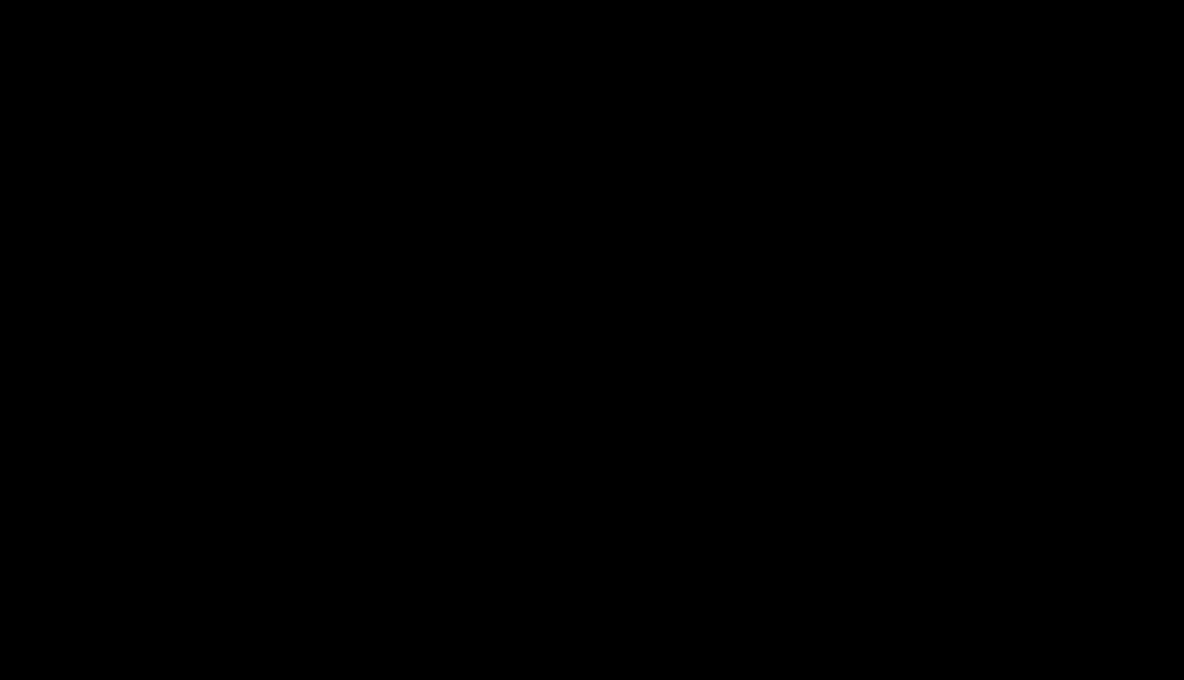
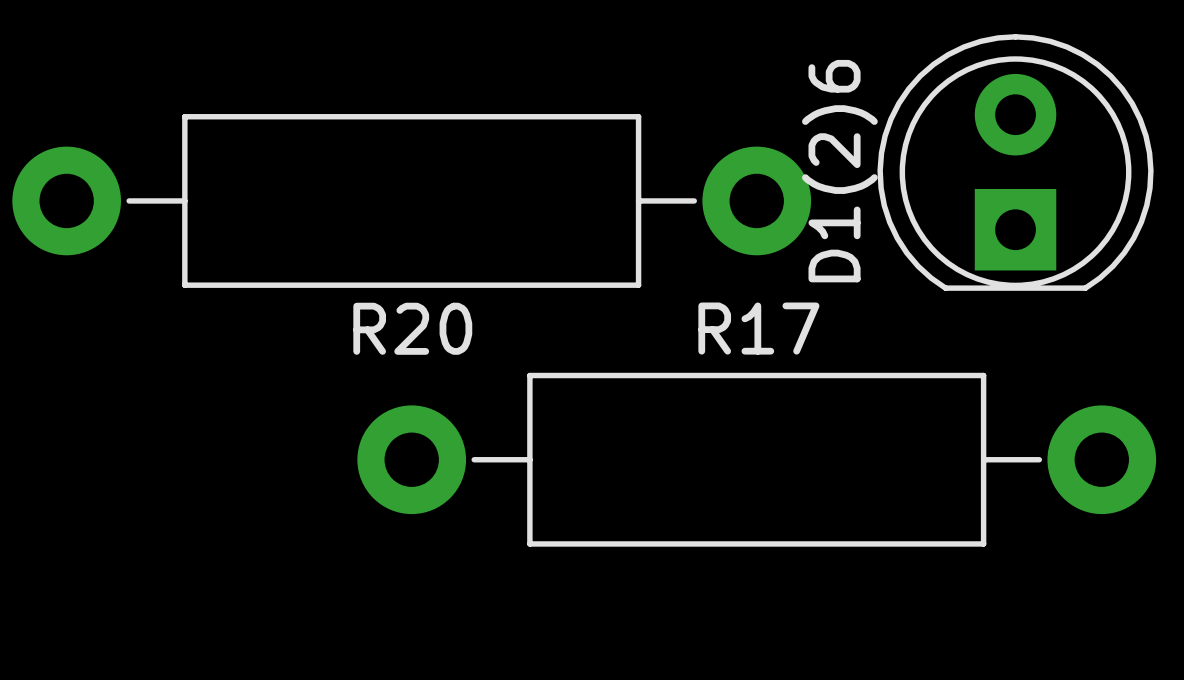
D1(2)6: none -> (1015, 162)
R20: none -> (411, 200)
R17: none -> (756, 459)

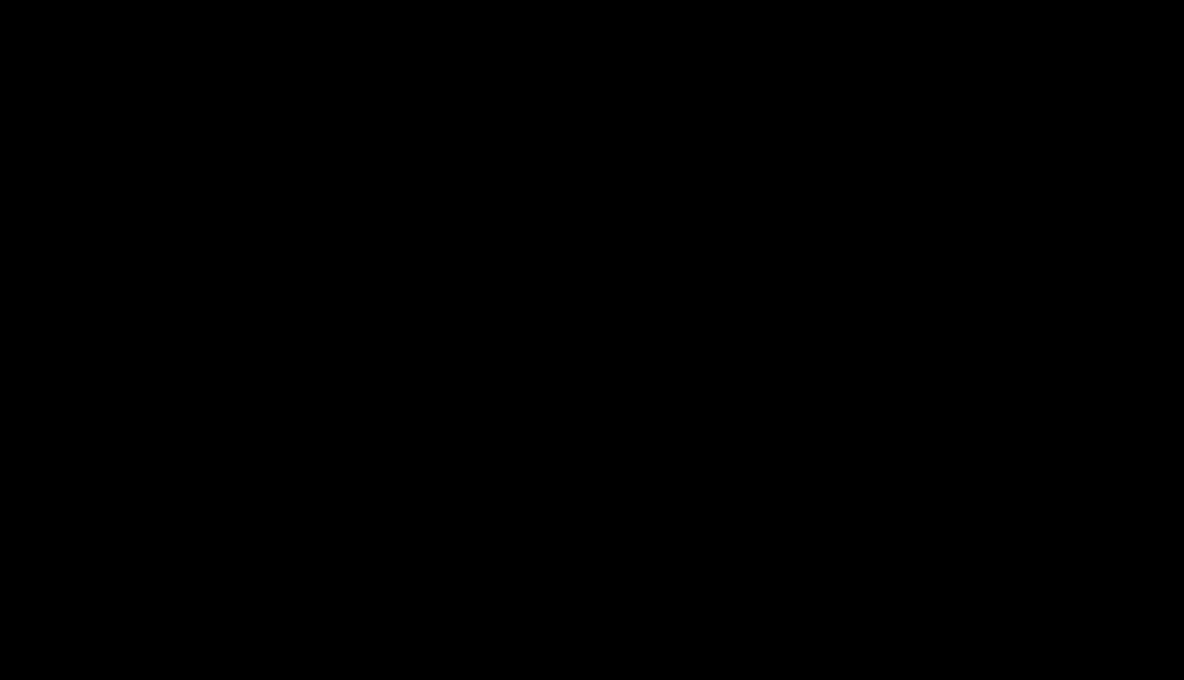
D1(2)6: (1015, 162) -> none
R20: (411, 200) -> none
R17: (756, 459) -> none

